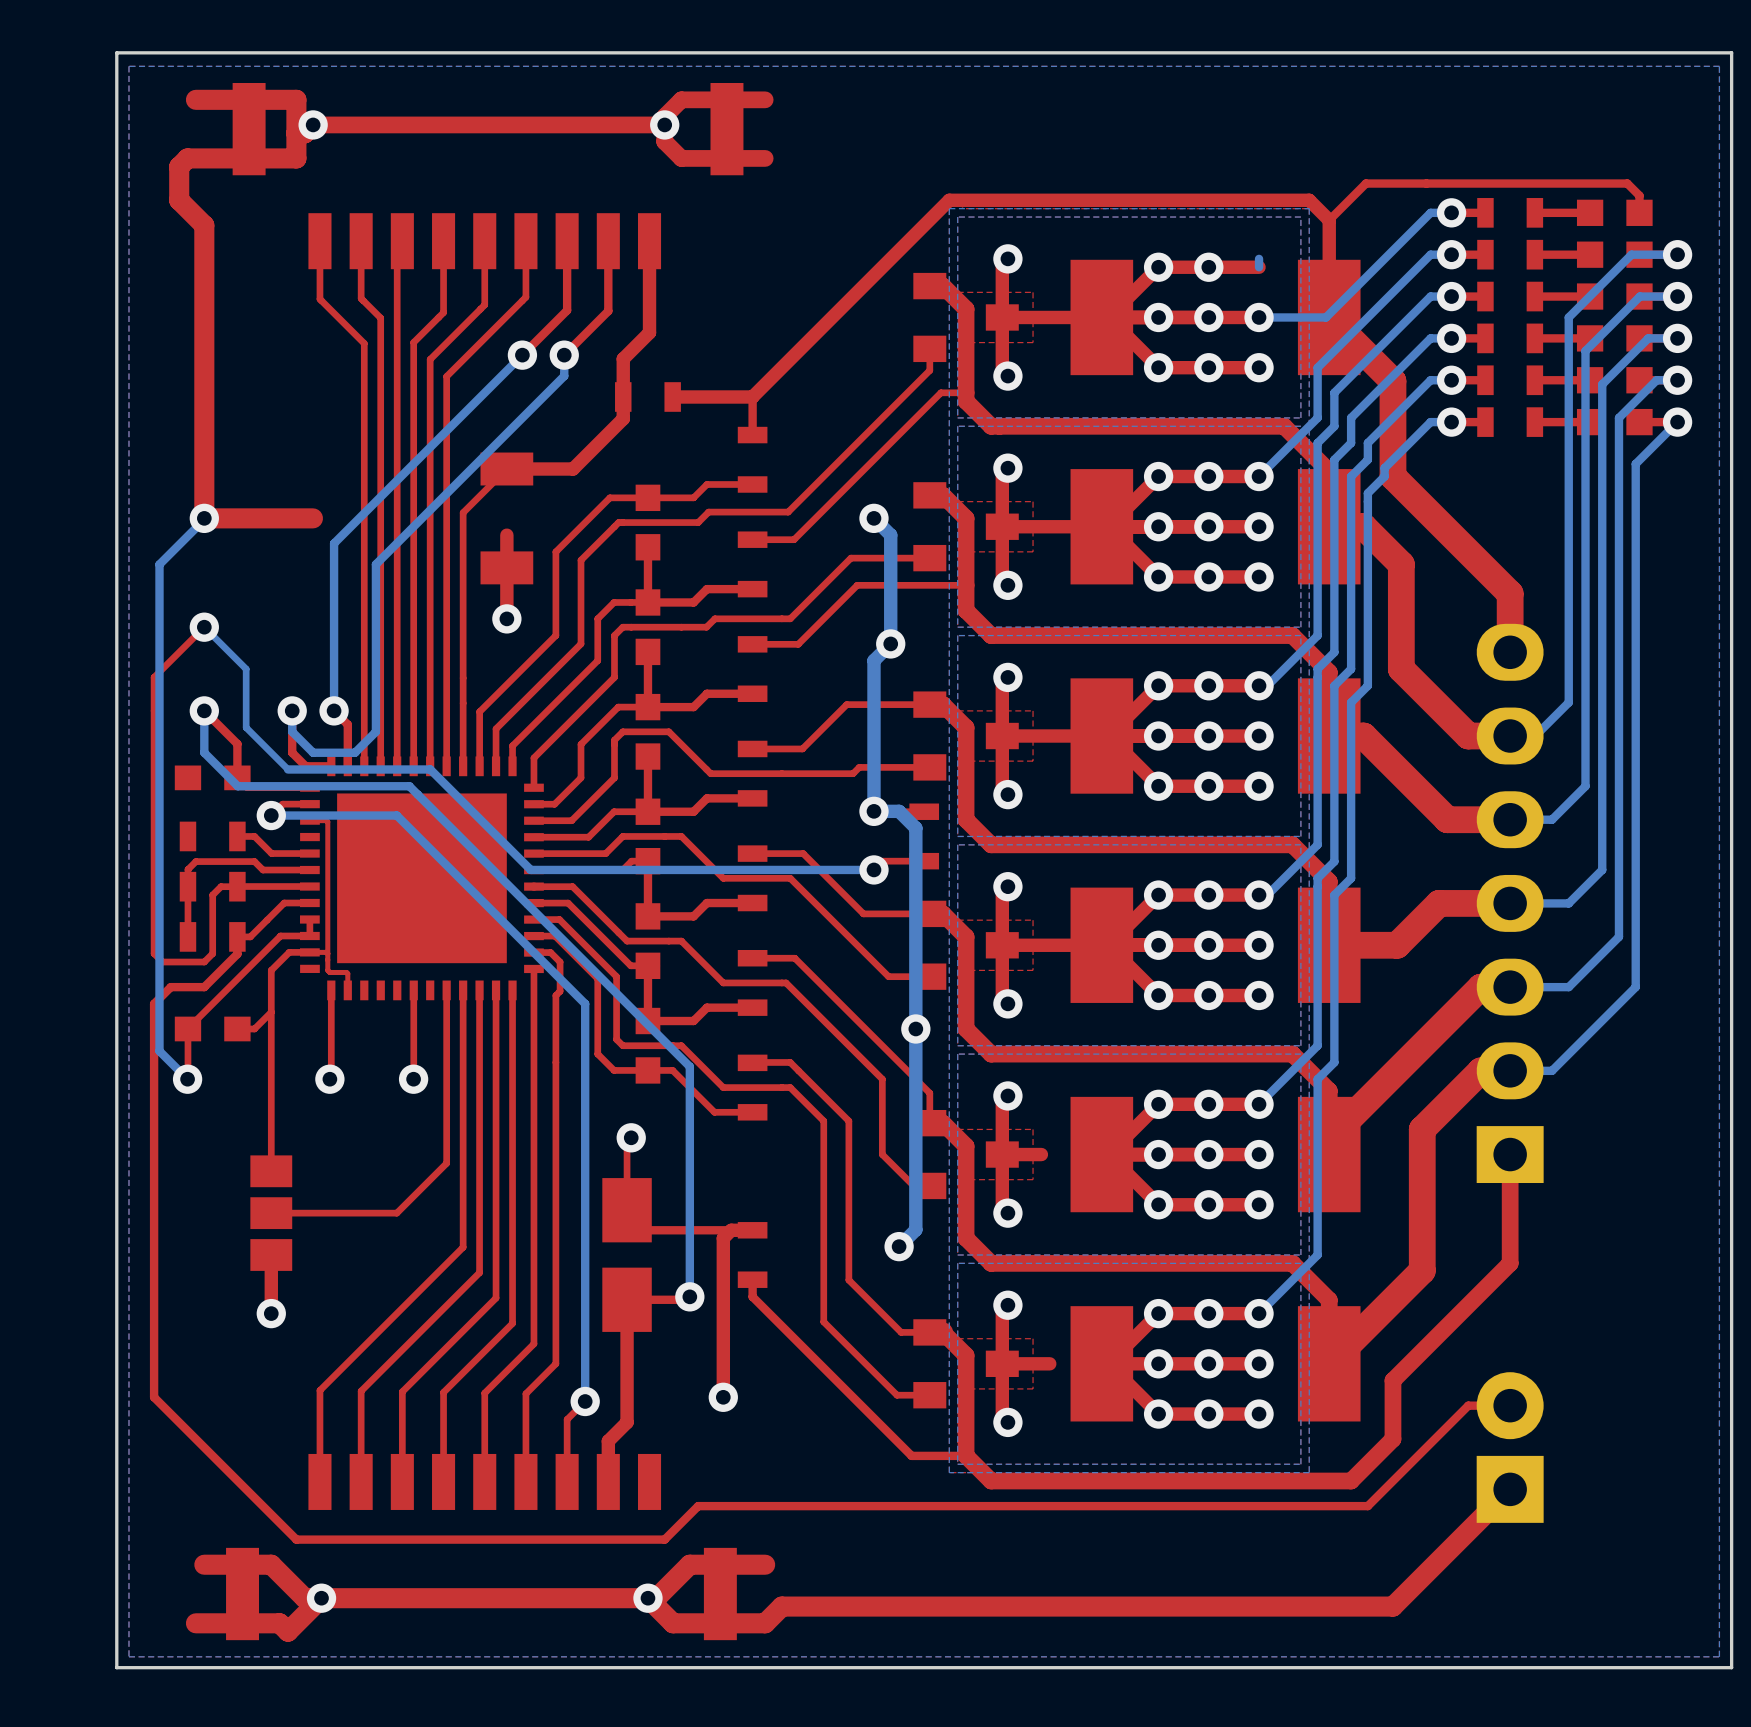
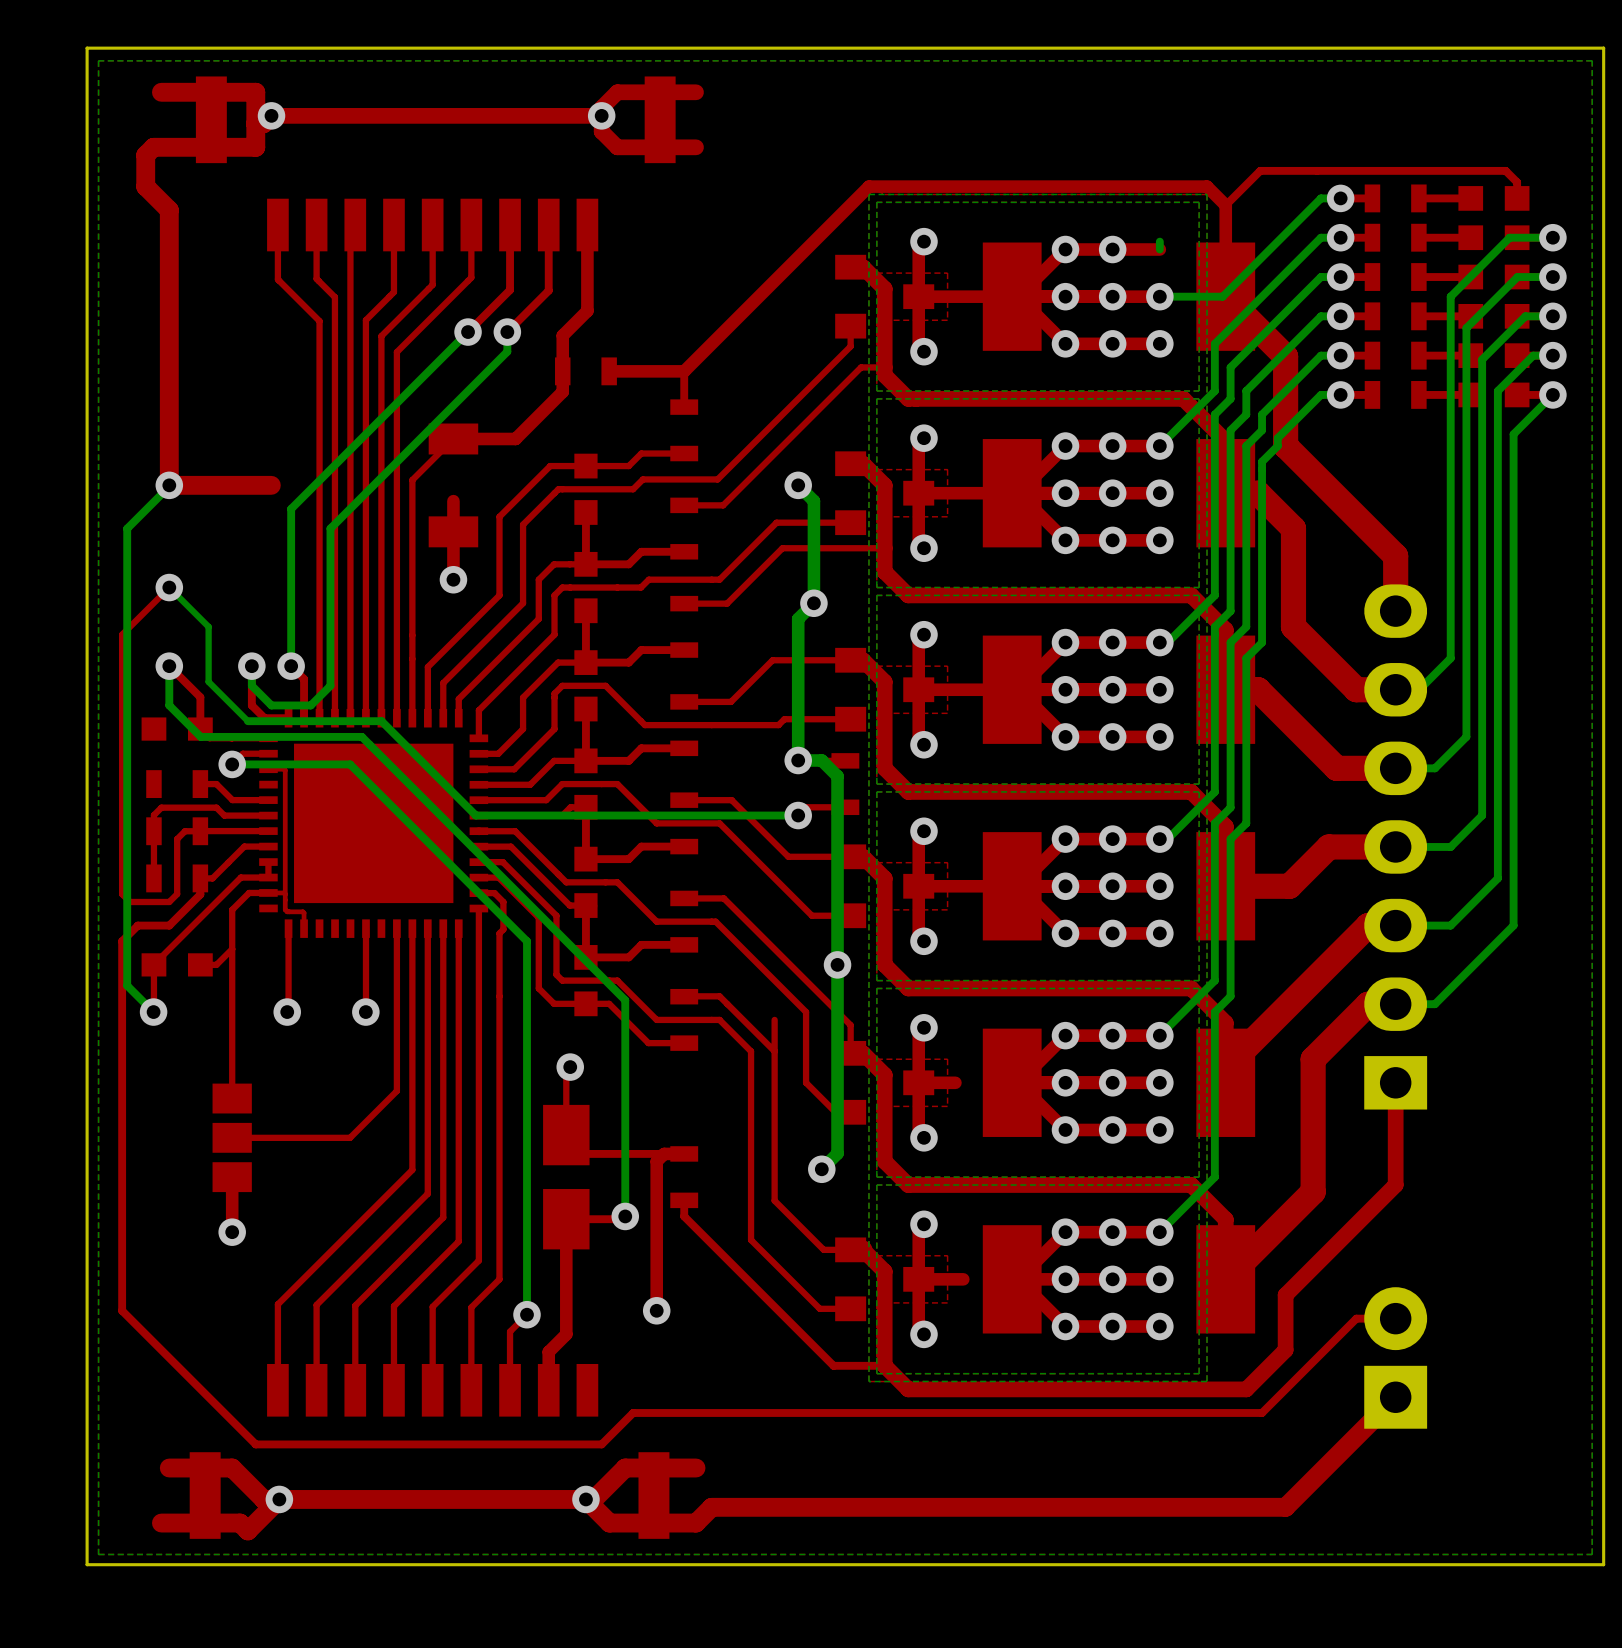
top track: none -> (774, 1019) (774, 1051)

